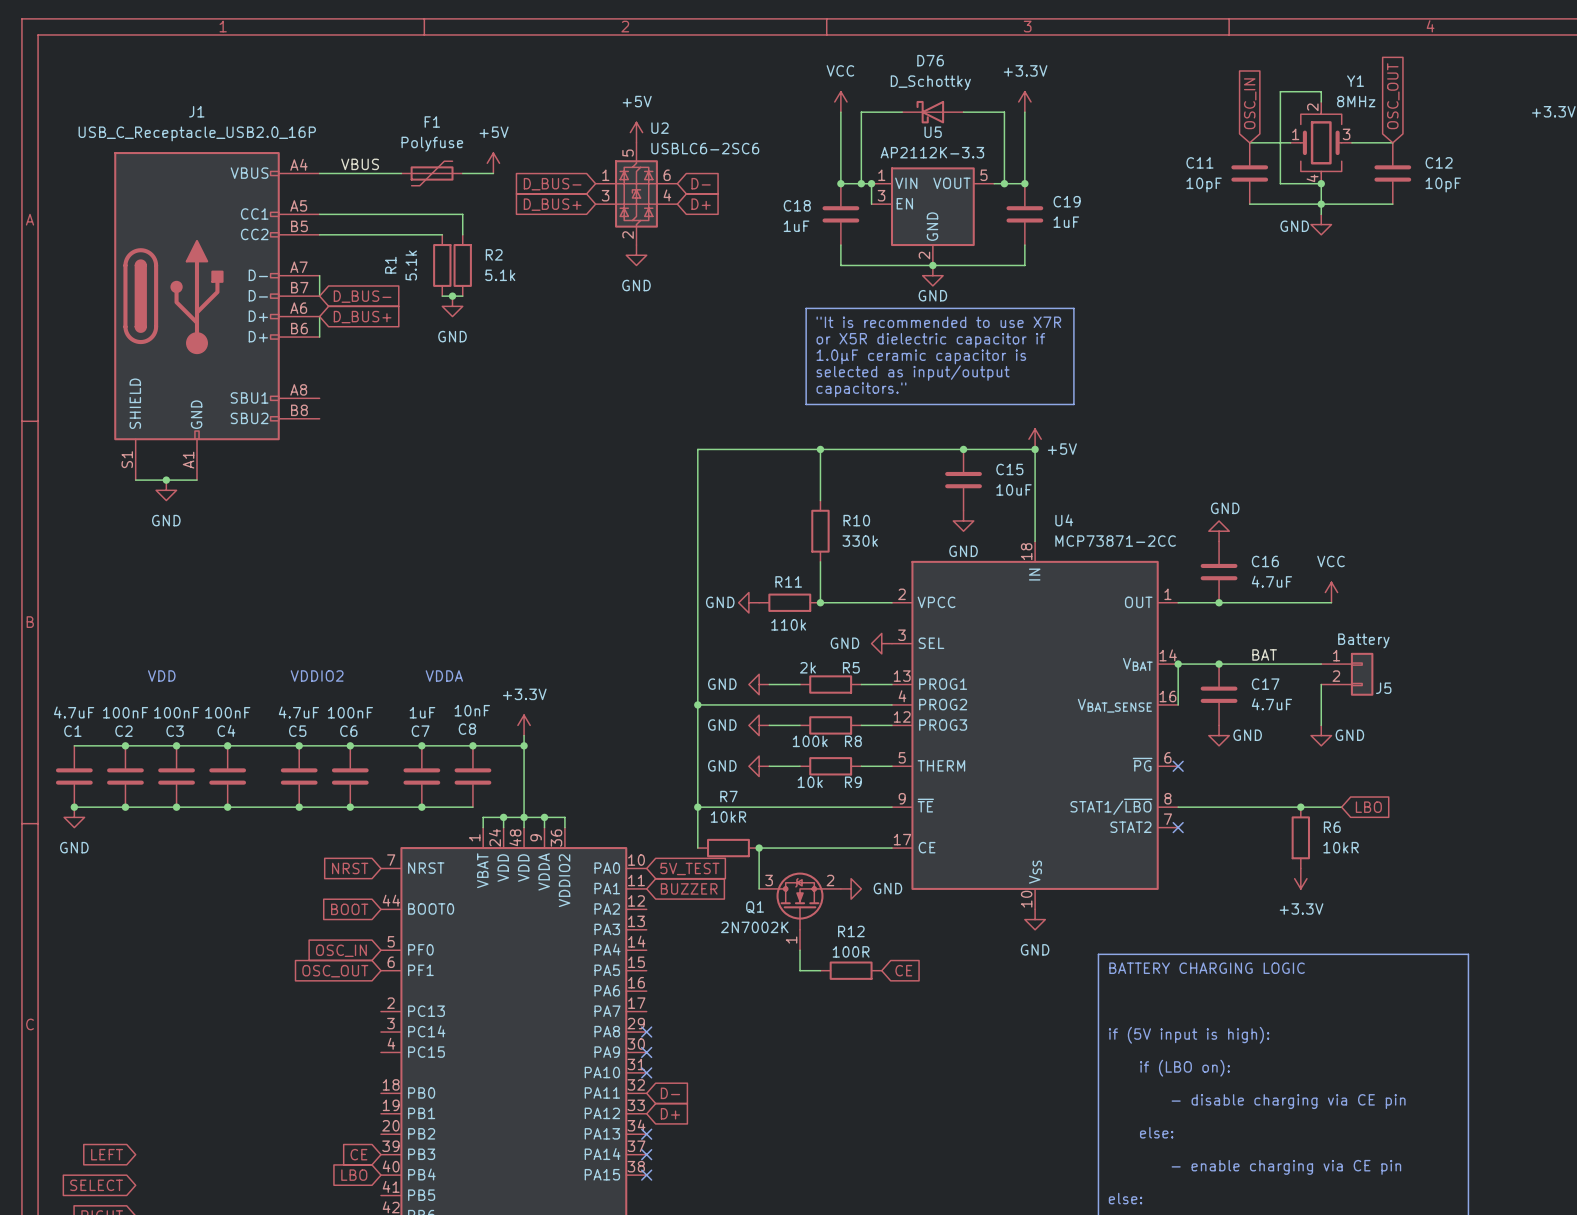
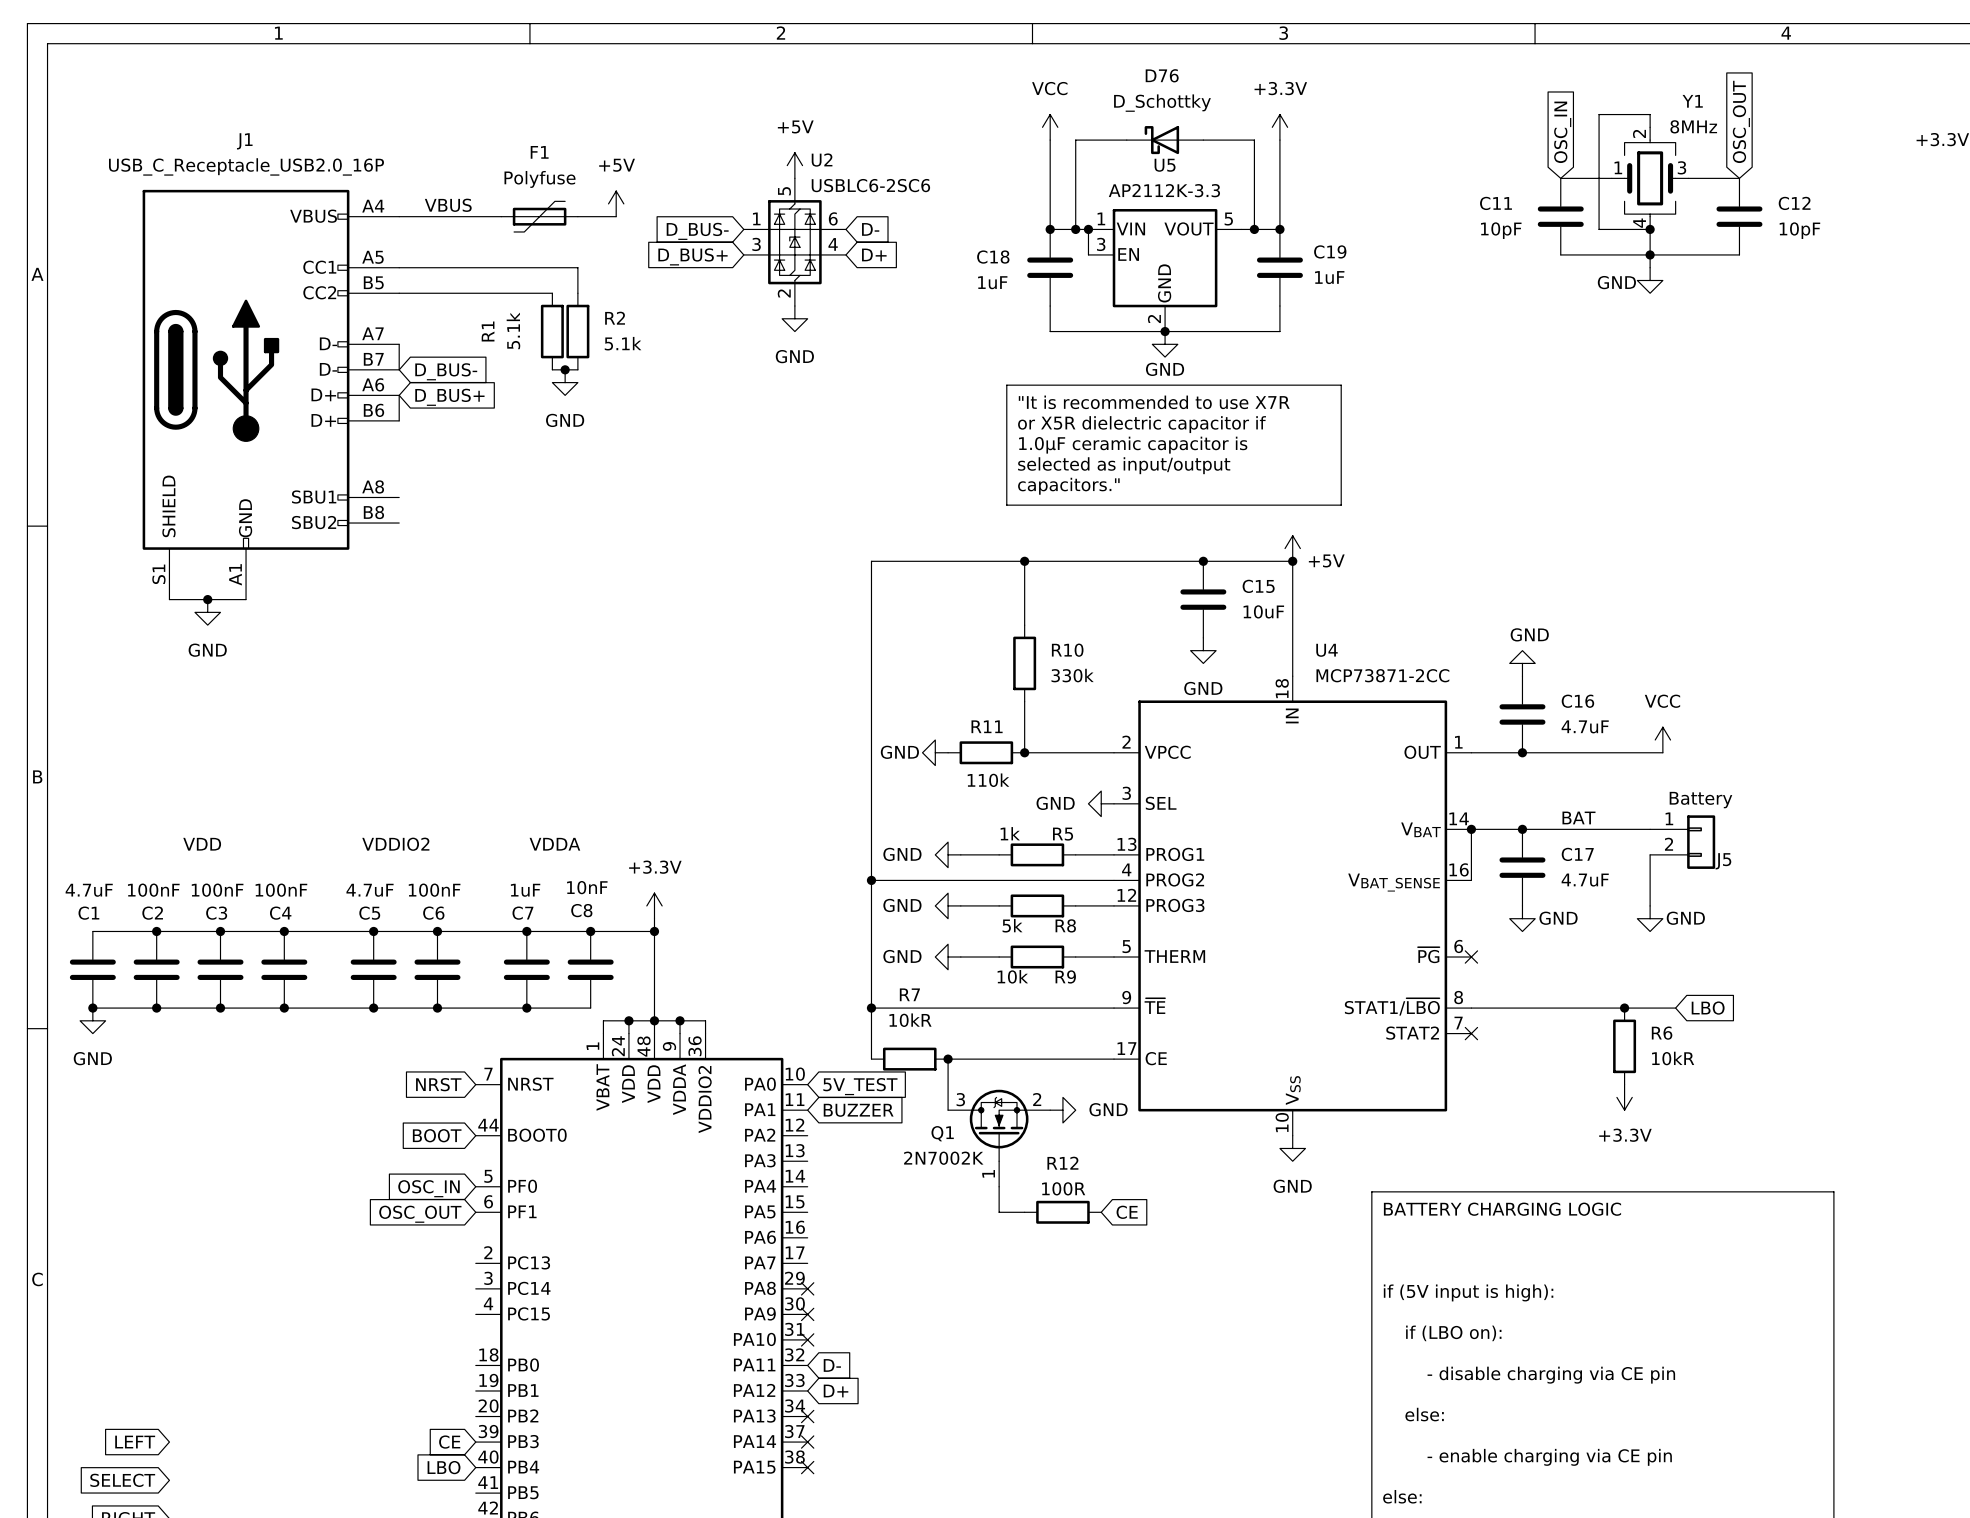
R5 value: 2k (807, 667) -> 1k (1010, 833)
R8 value: 100k (810, 741) -> 5k (1012, 925)

